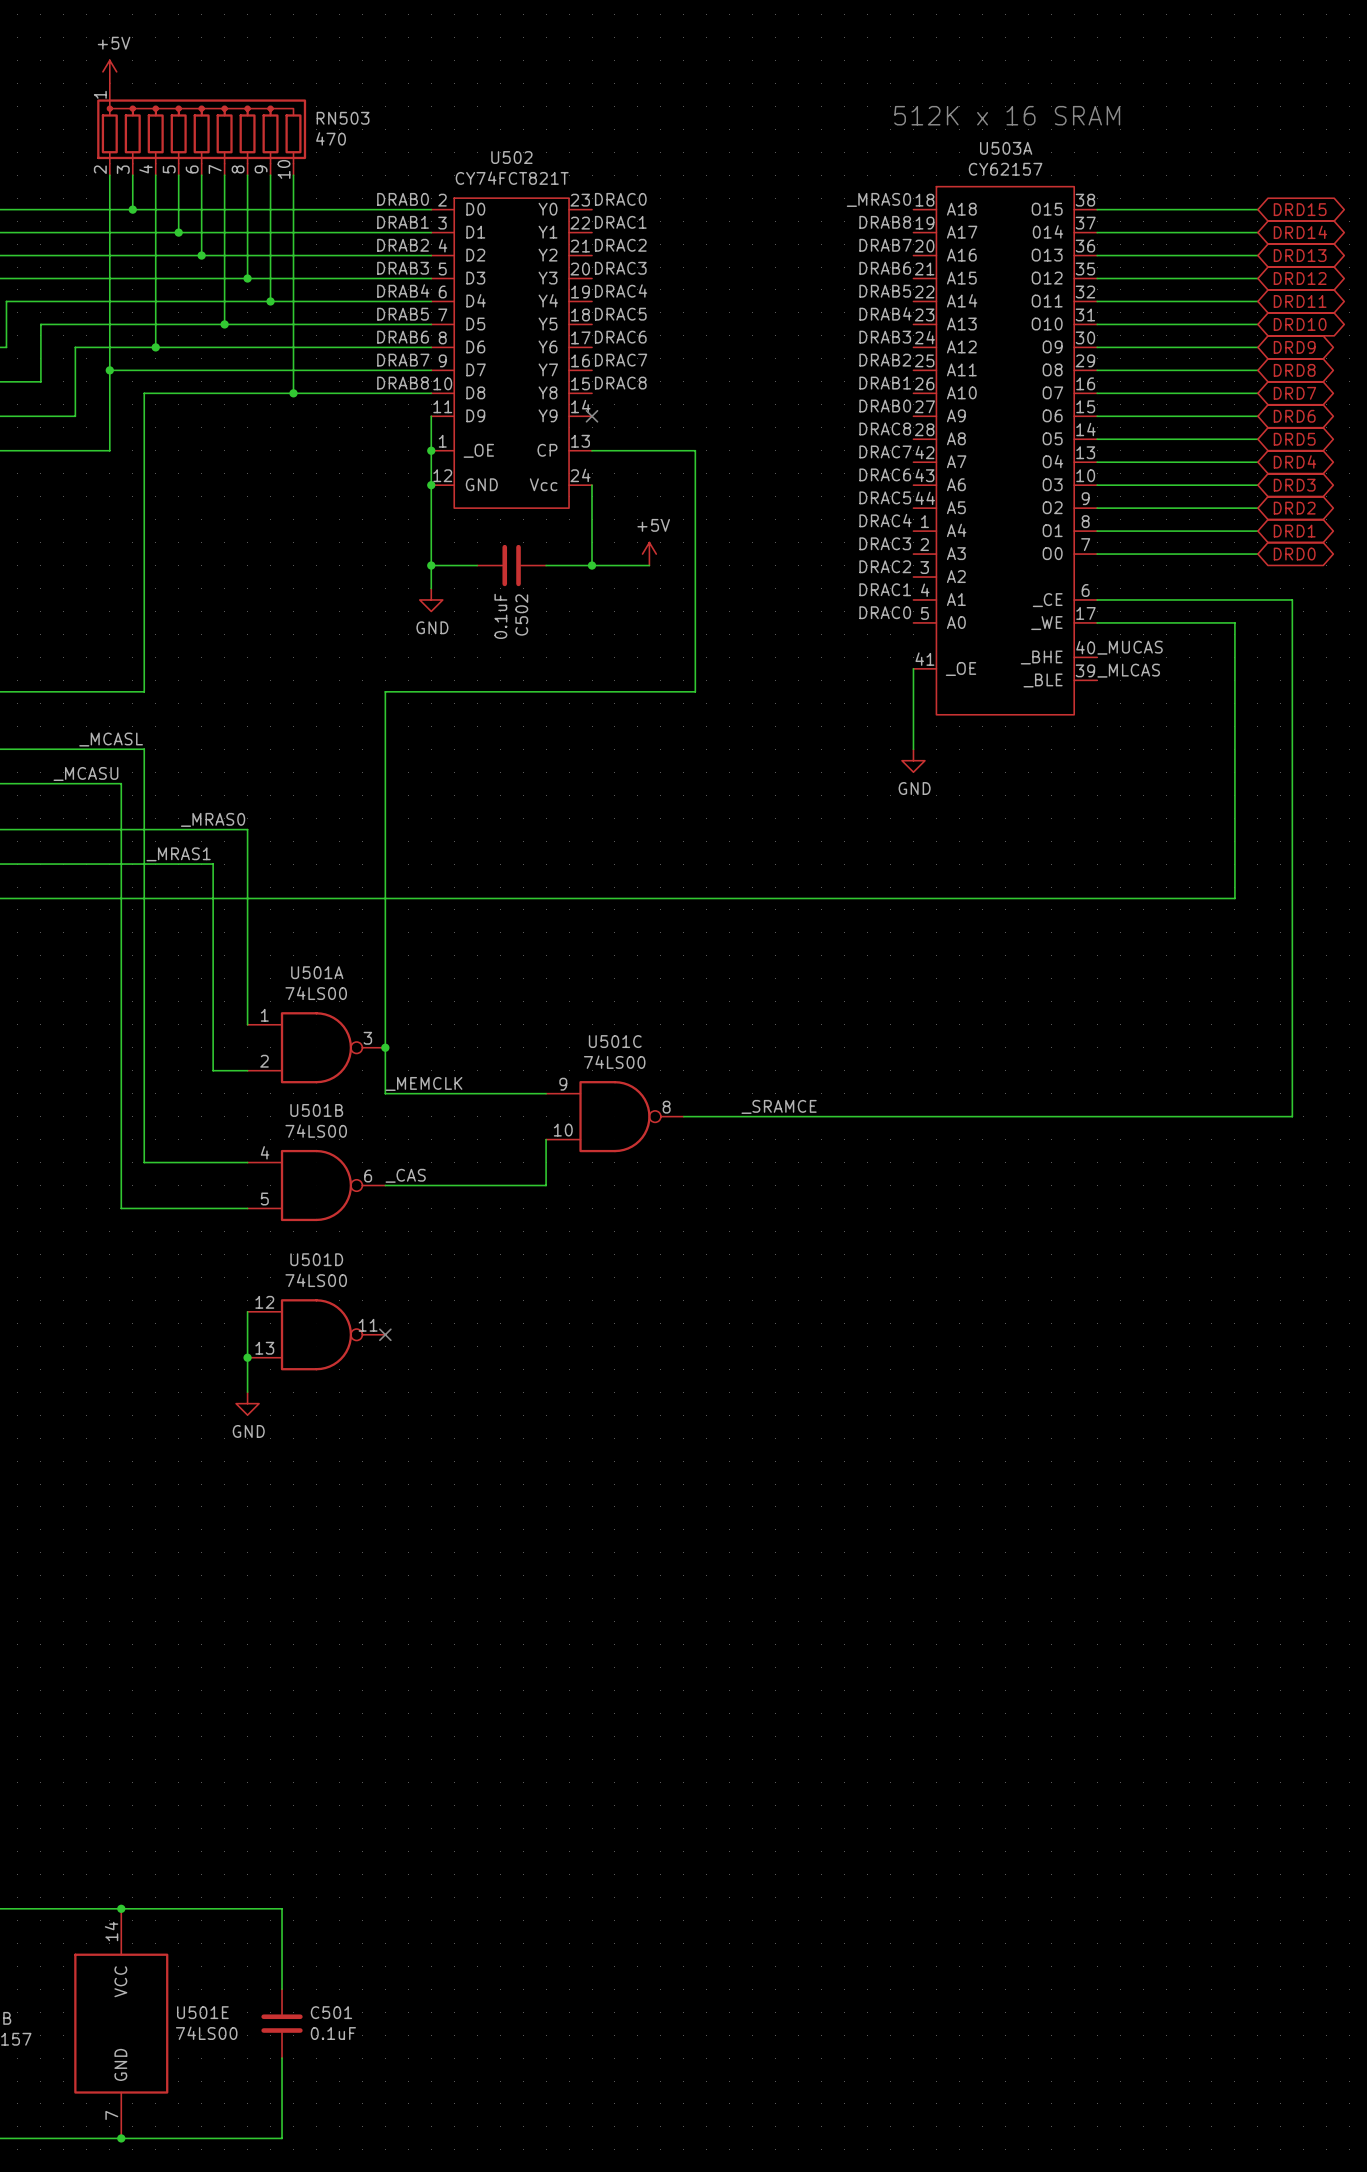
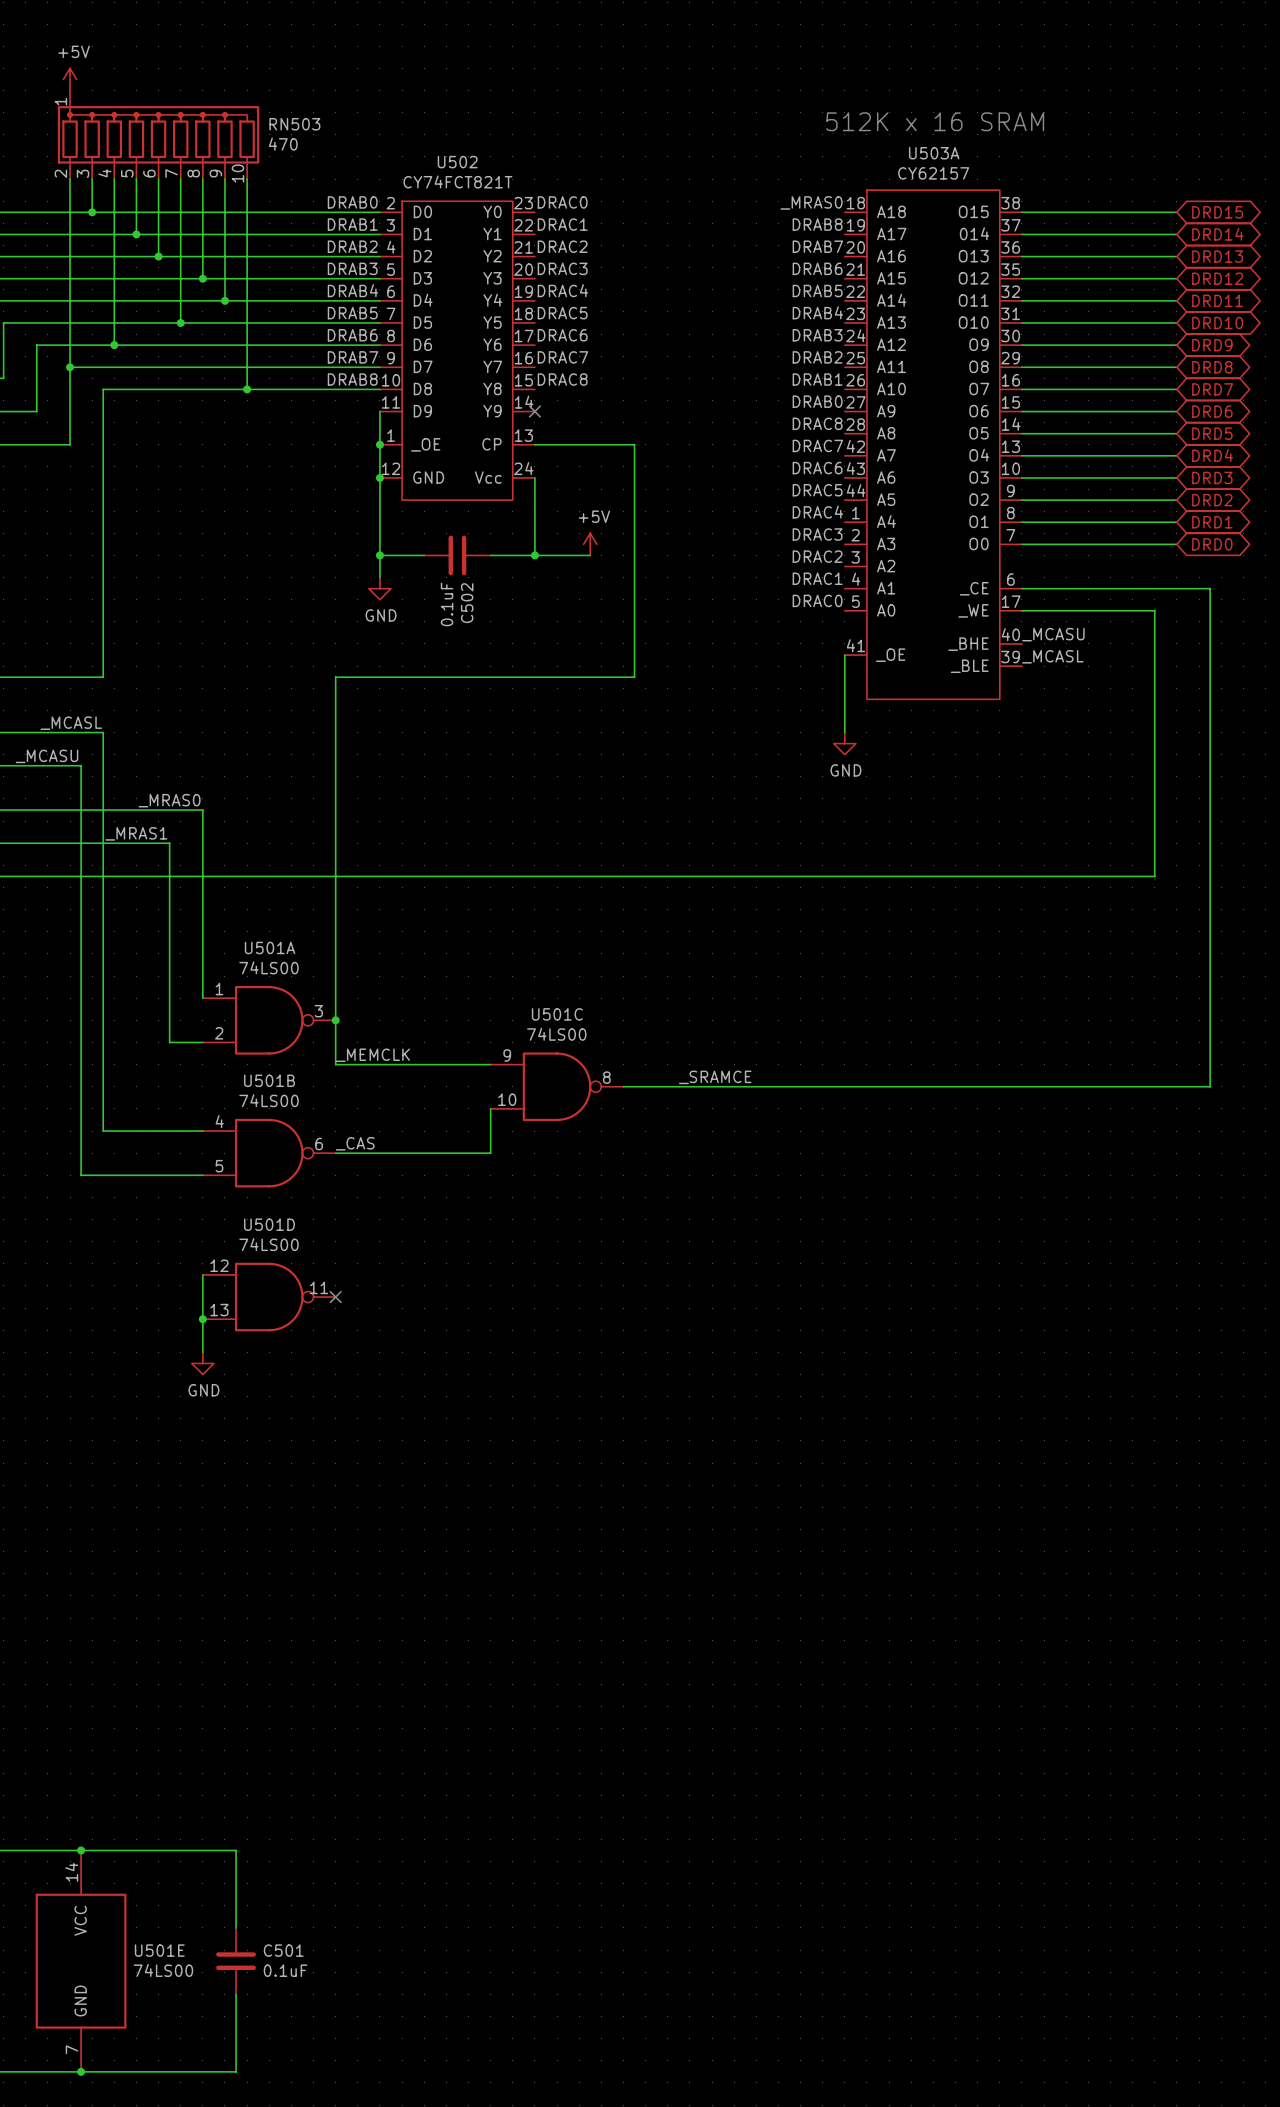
label: _MUCAS (1130, 647) -> _MCASU (1053, 634)
label: _MLCAS (1128, 670) -> _MCASL (1052, 656)

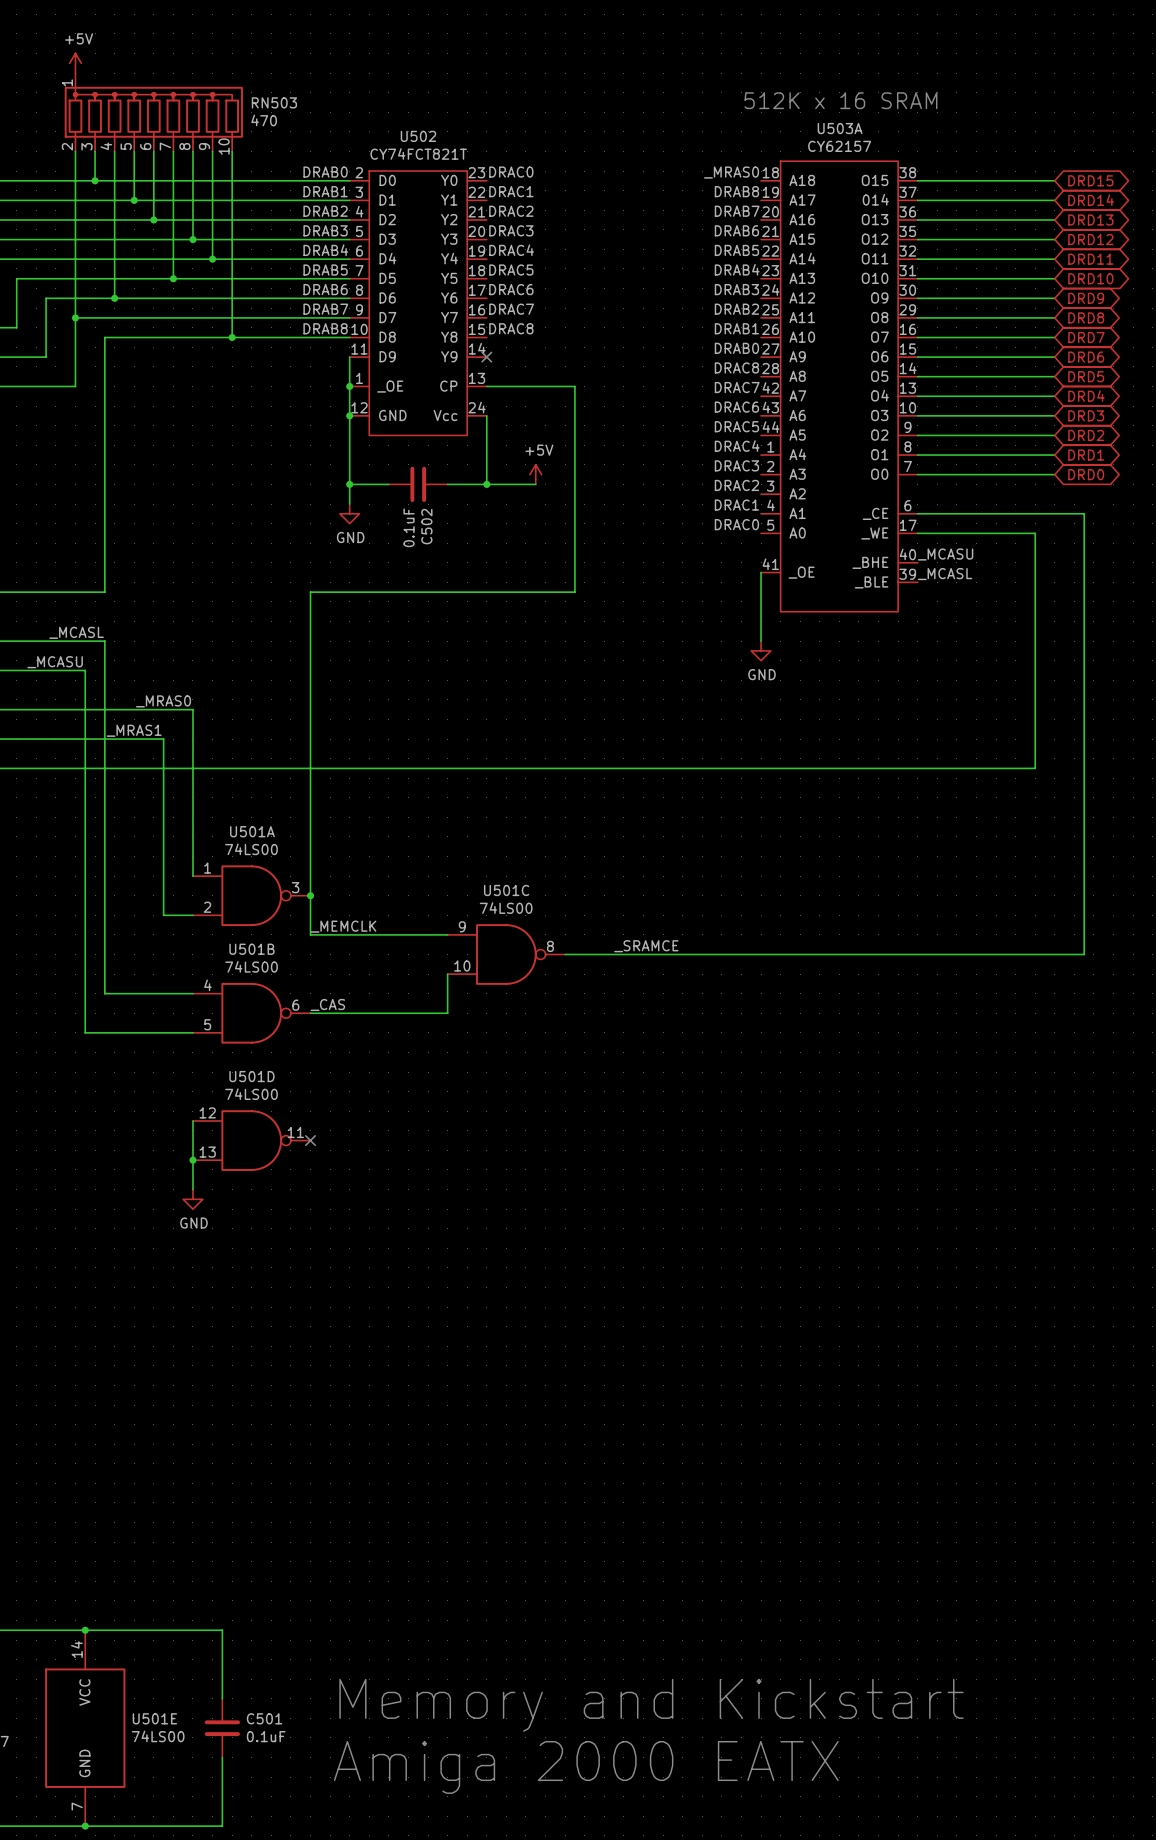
text: none -> Memory and Kickstart (651, 1705)
text: none -> Amiga 2000 EATX (586, 1767)

